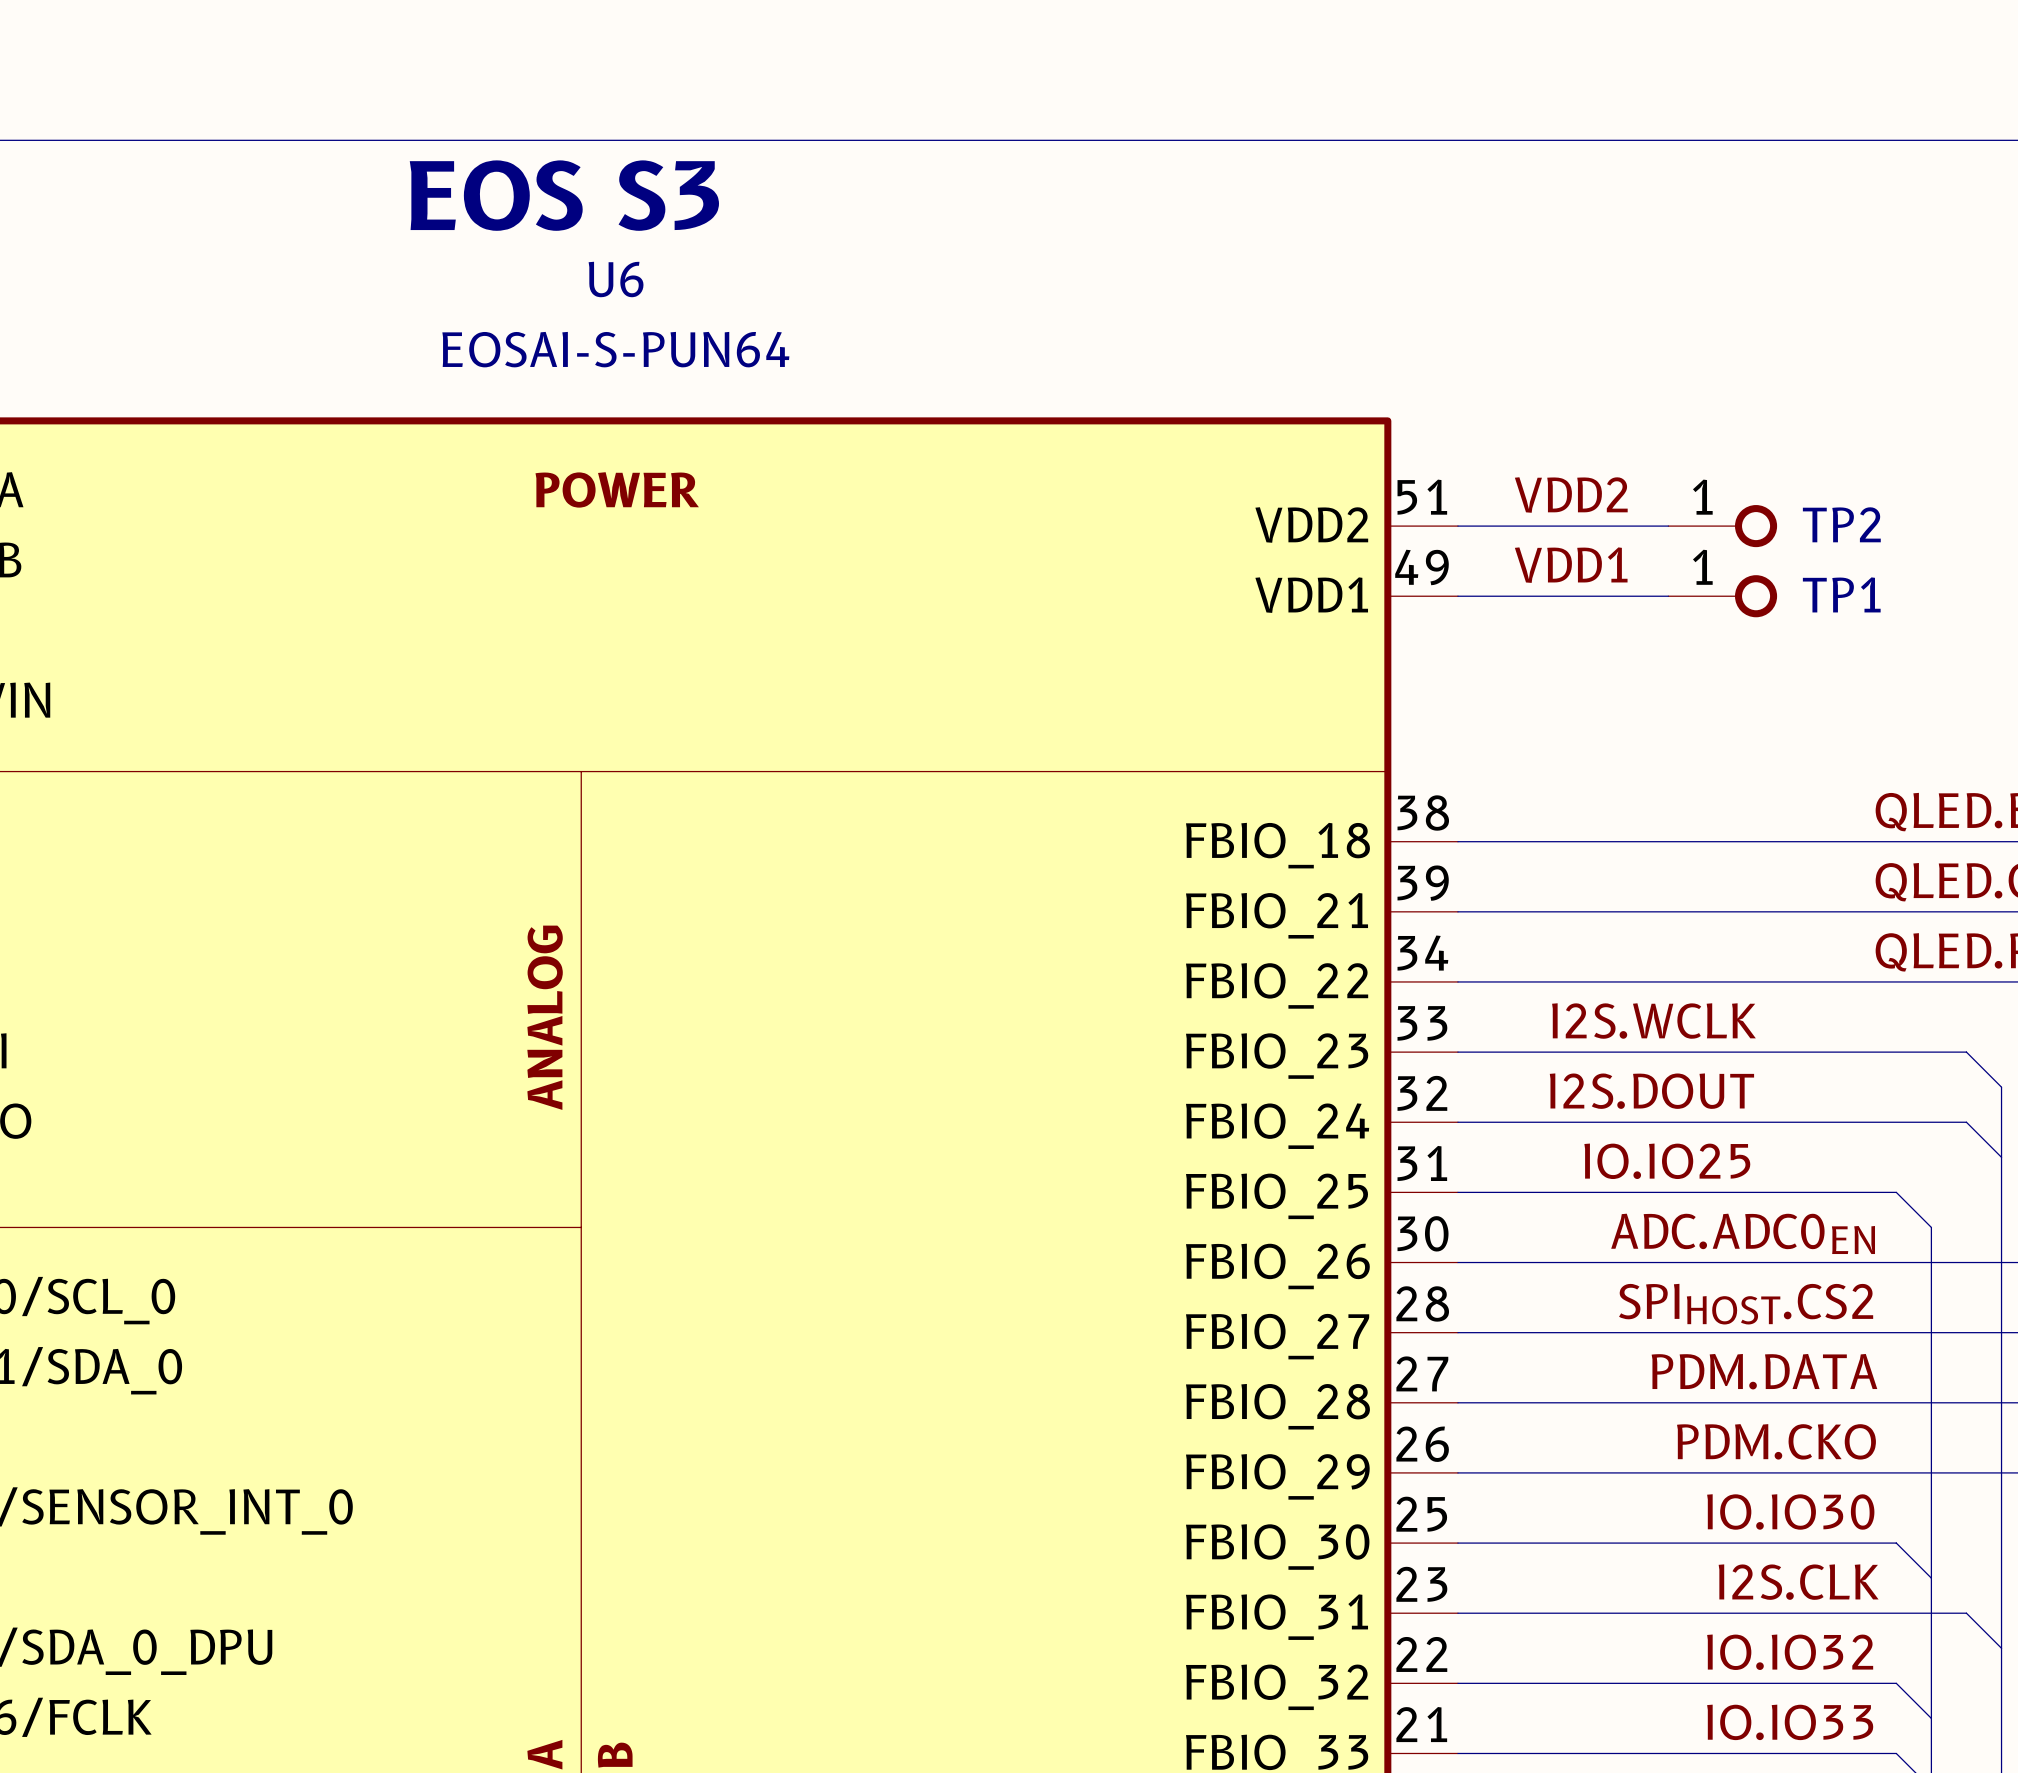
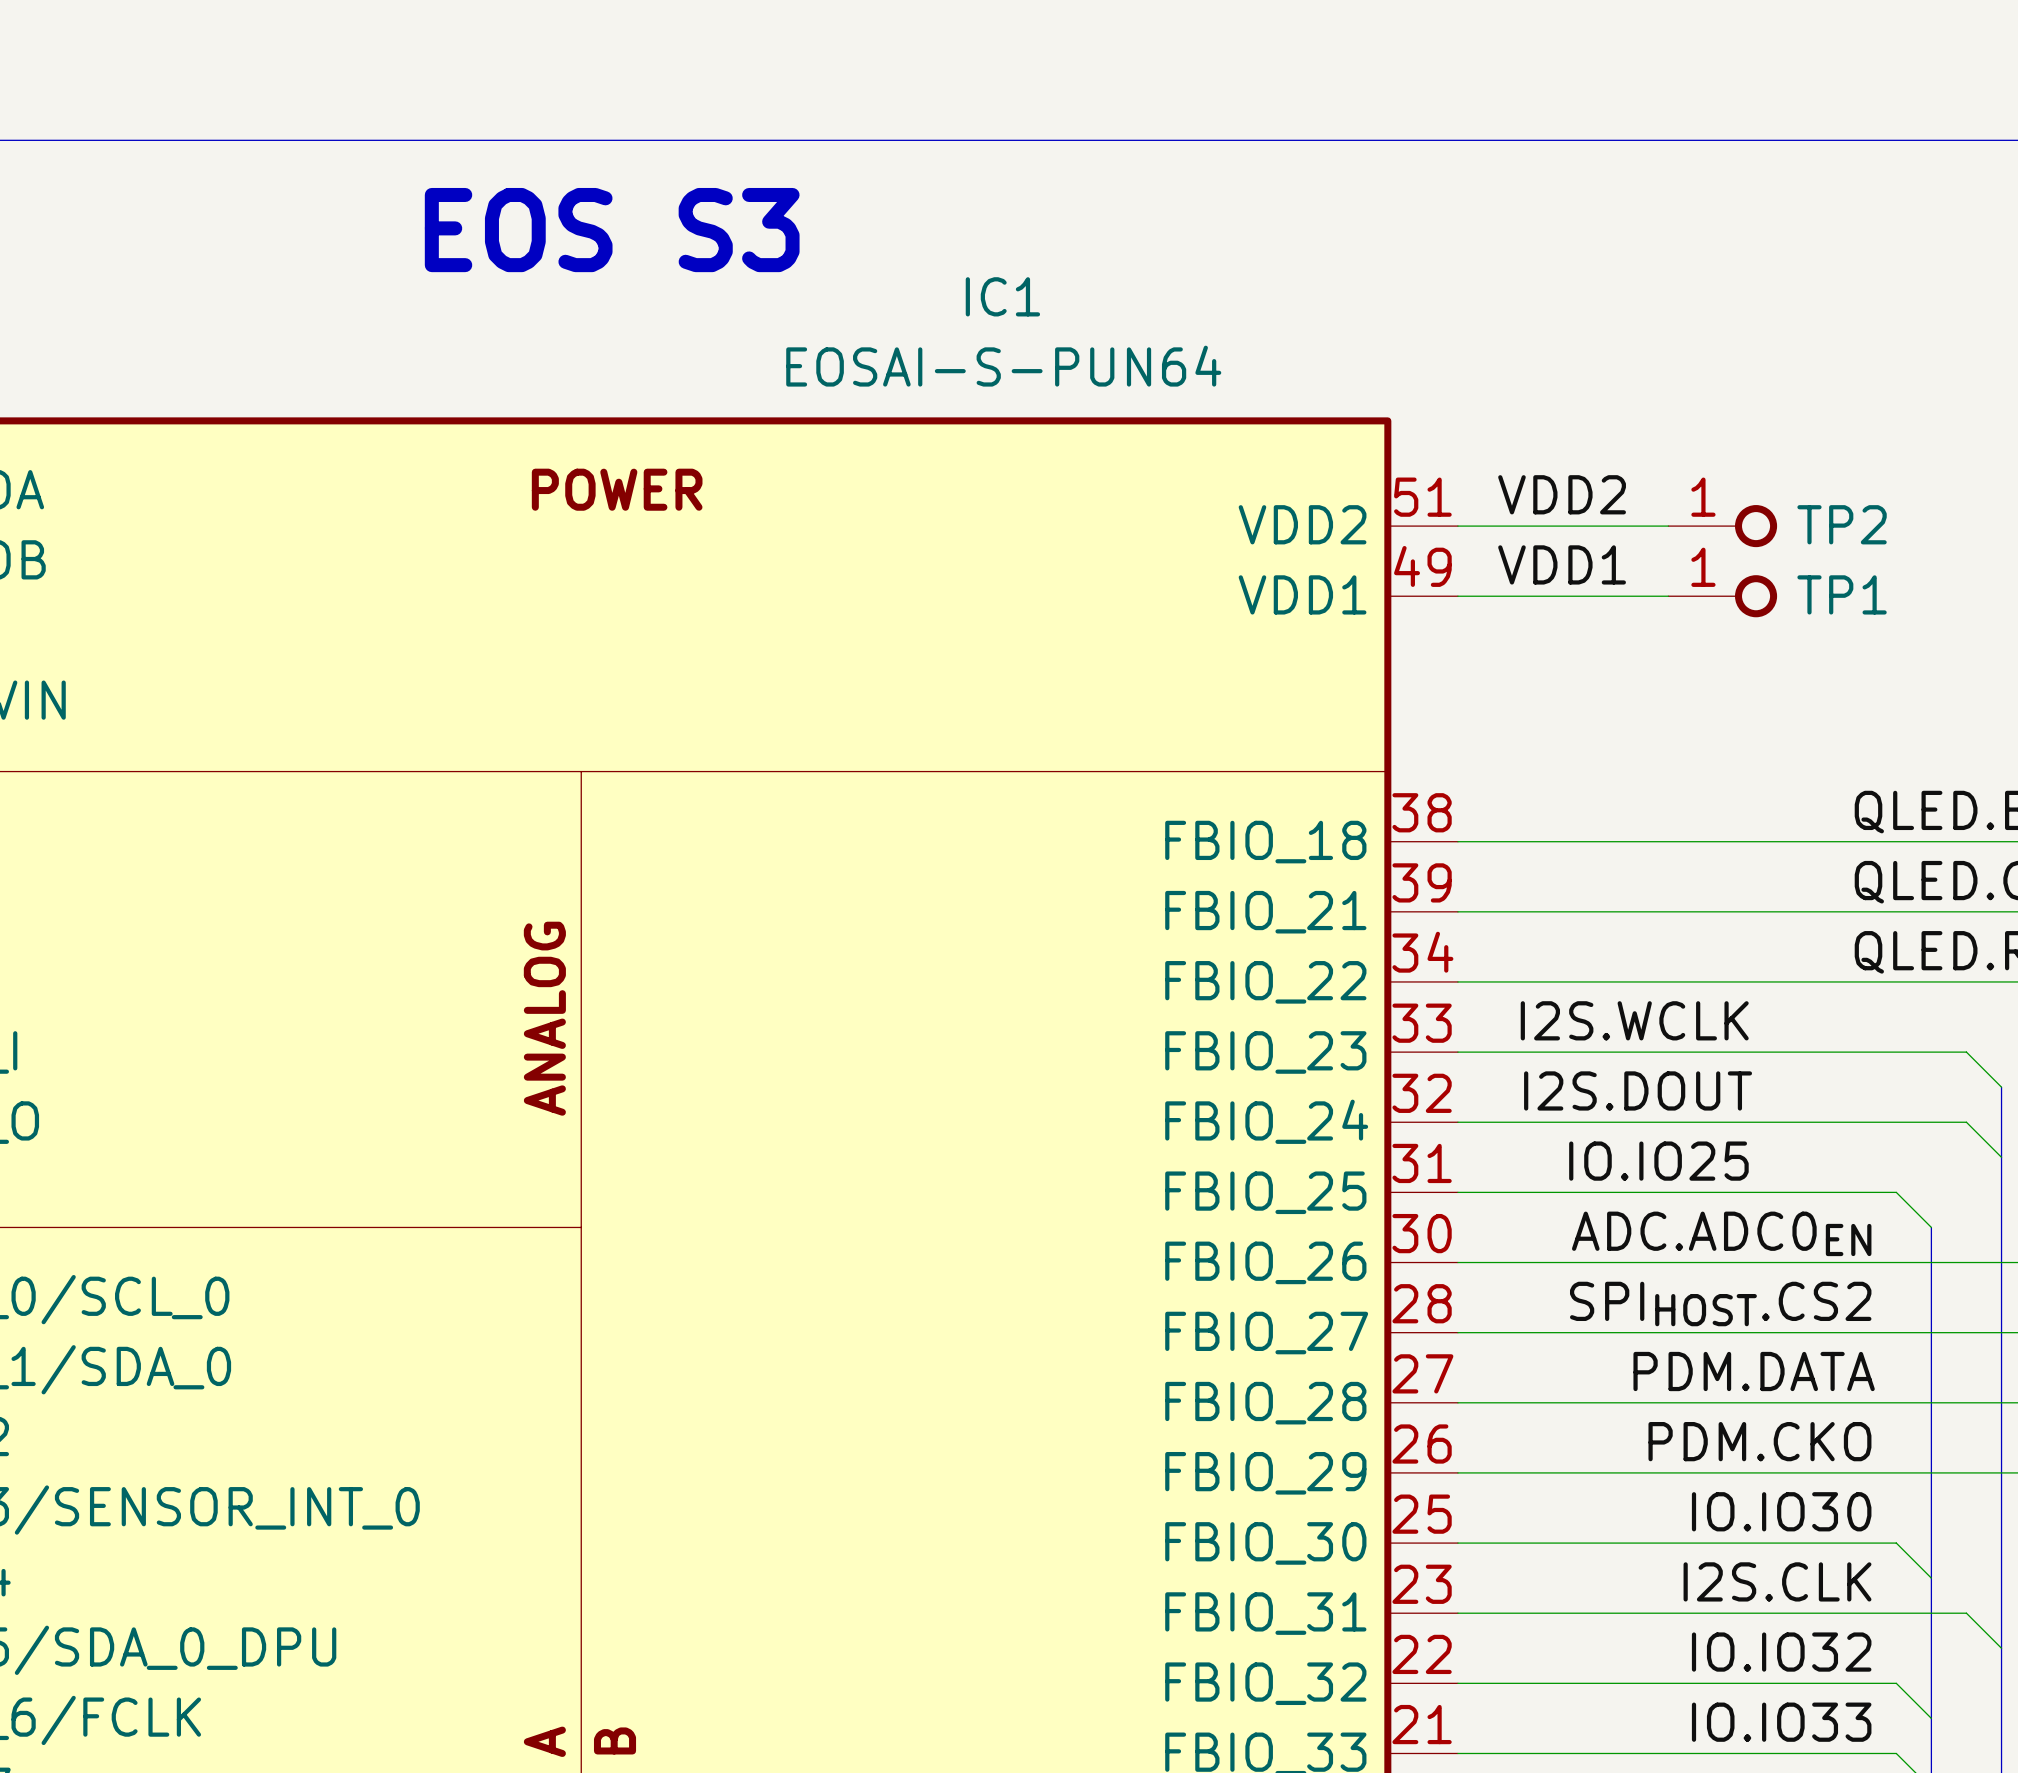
text position: EOS S3 (564, 195) -> EOS S3 (612, 230)
U6 name: U6 (616, 279) -> IC1 (1002, 296)
U6 text position: EOSAI-S-PUN64 (615, 349) -> EOSAI-S-PUN64 (1003, 366)

